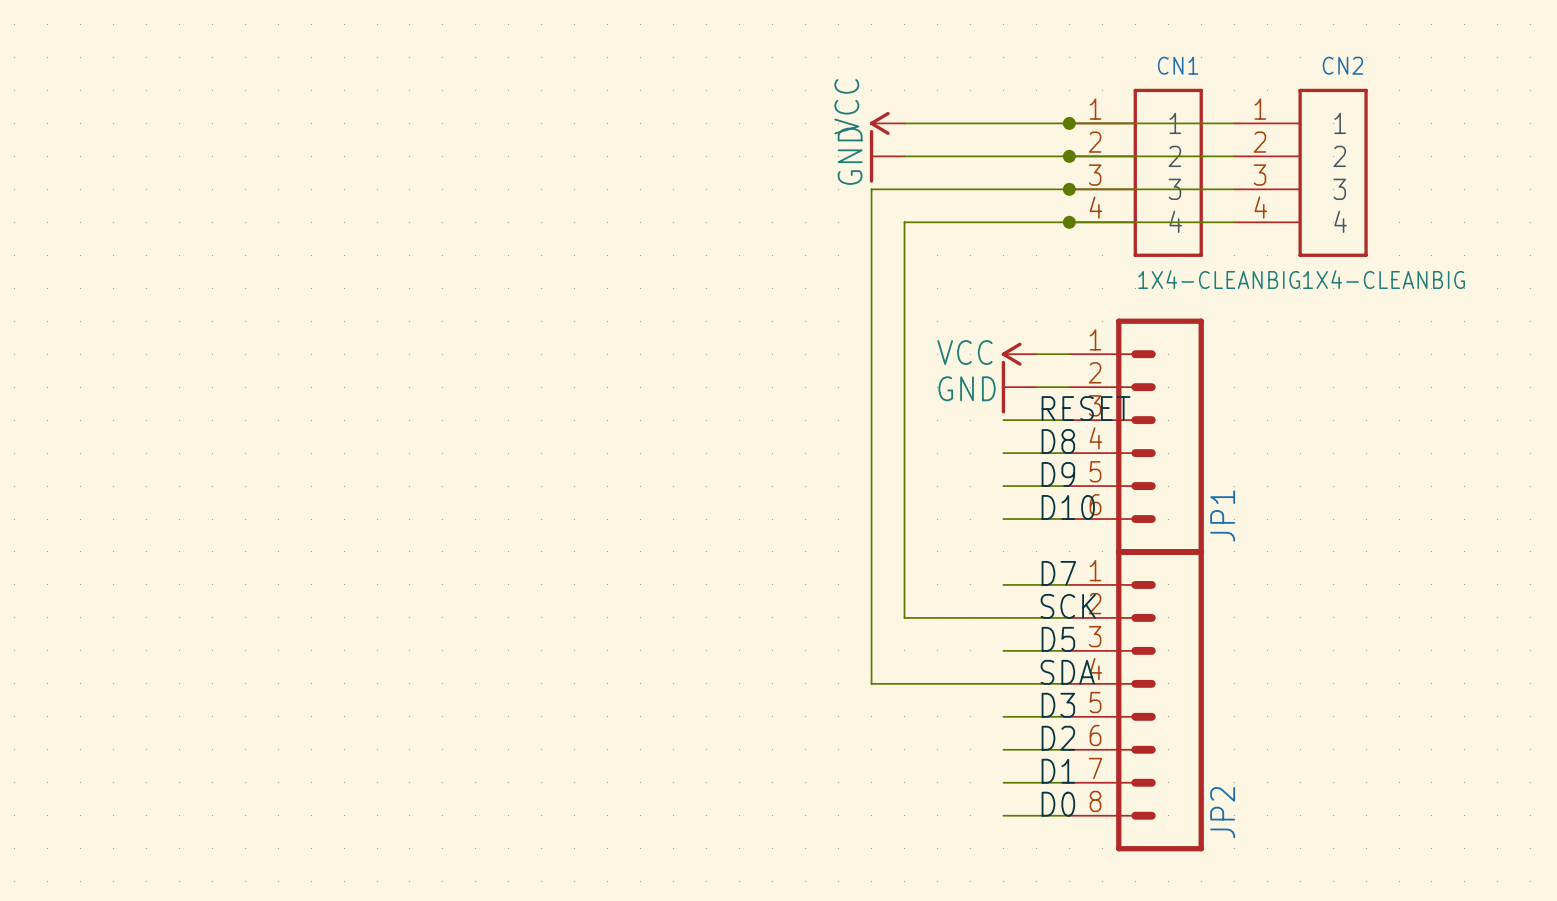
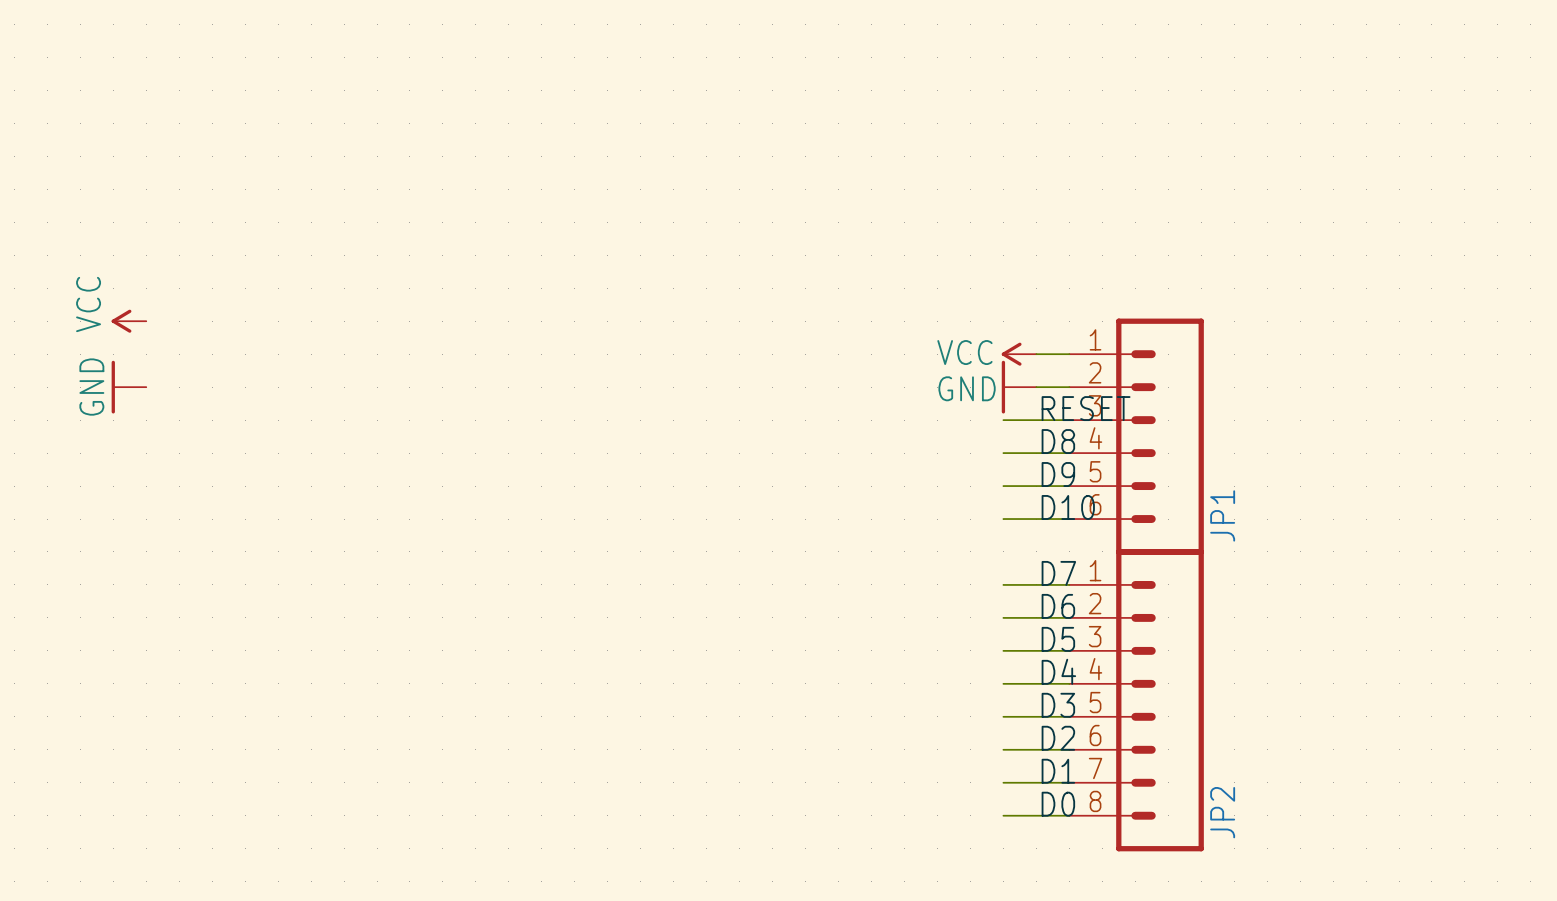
power symbol: VCC (887, 123) -> none
wire: (904, 123) (1234, 123) -> none
junction: (1069, 123) -> none
power symbol: GND (887, 156) -> none
wire: (904, 156) (1234, 156) -> none
junction: (1069, 156) -> none
CN1: 1X4-CLEANBIG (1136, 172) -> none
CN2: 1X4-CLEANBIG (1300, 172) -> none
junction: (1069, 189) -> none
wire: (1234, 189) (871, 189) (871, 683) (1003, 683) -> none
junction: (1069, 222) -> none
wire: (1234, 222) (904, 222) (904, 617) (1003, 617) -> none
power symbol: none -> VCC (128, 321)
power symbol: none -> GND (128, 387)
label: SCK (1068, 606) -> D6 (1058, 606)
label: SDA (1067, 672) -> D4 (1058, 671)

